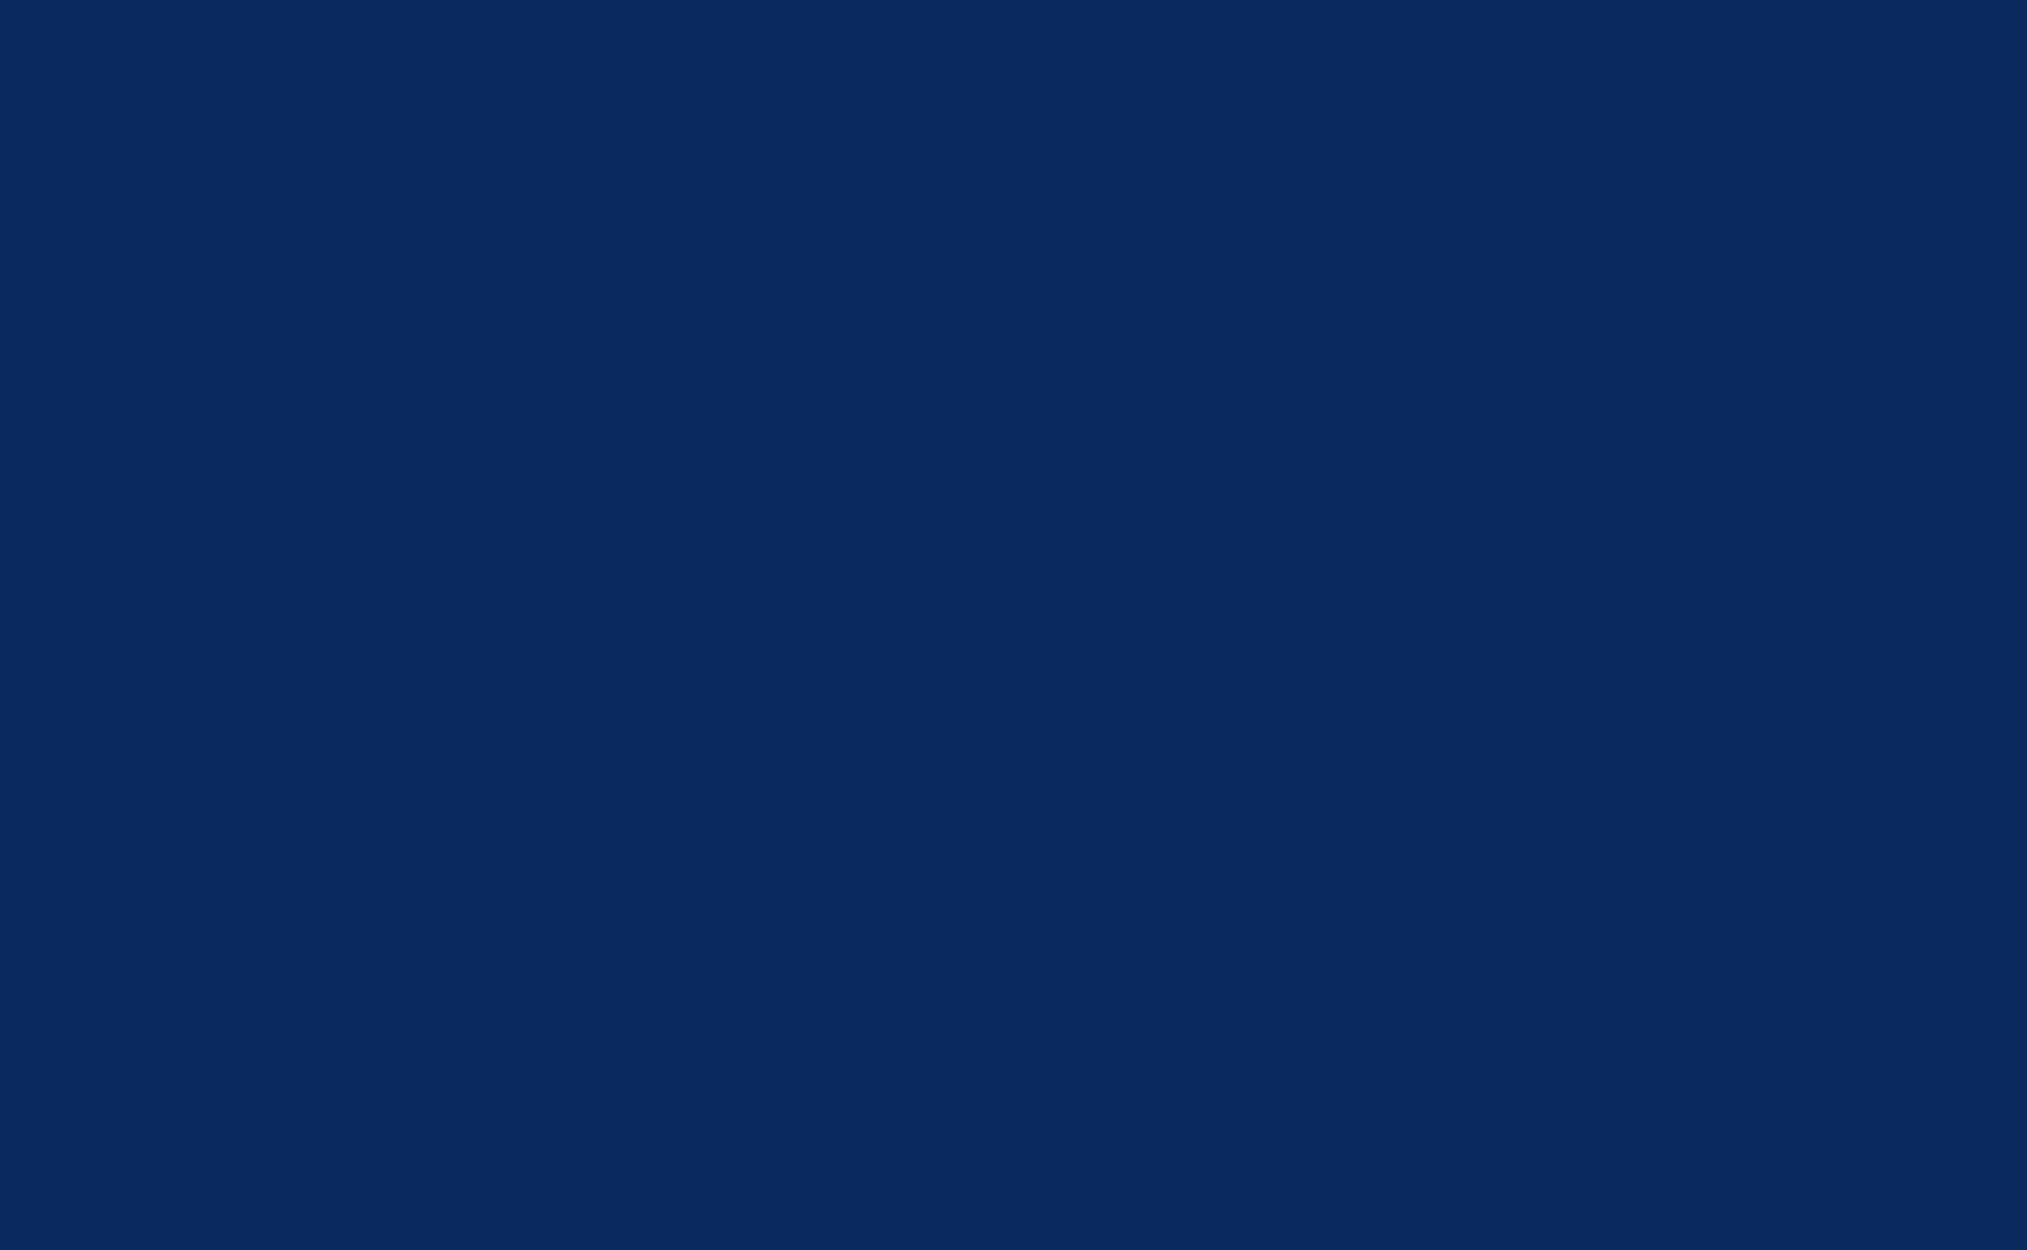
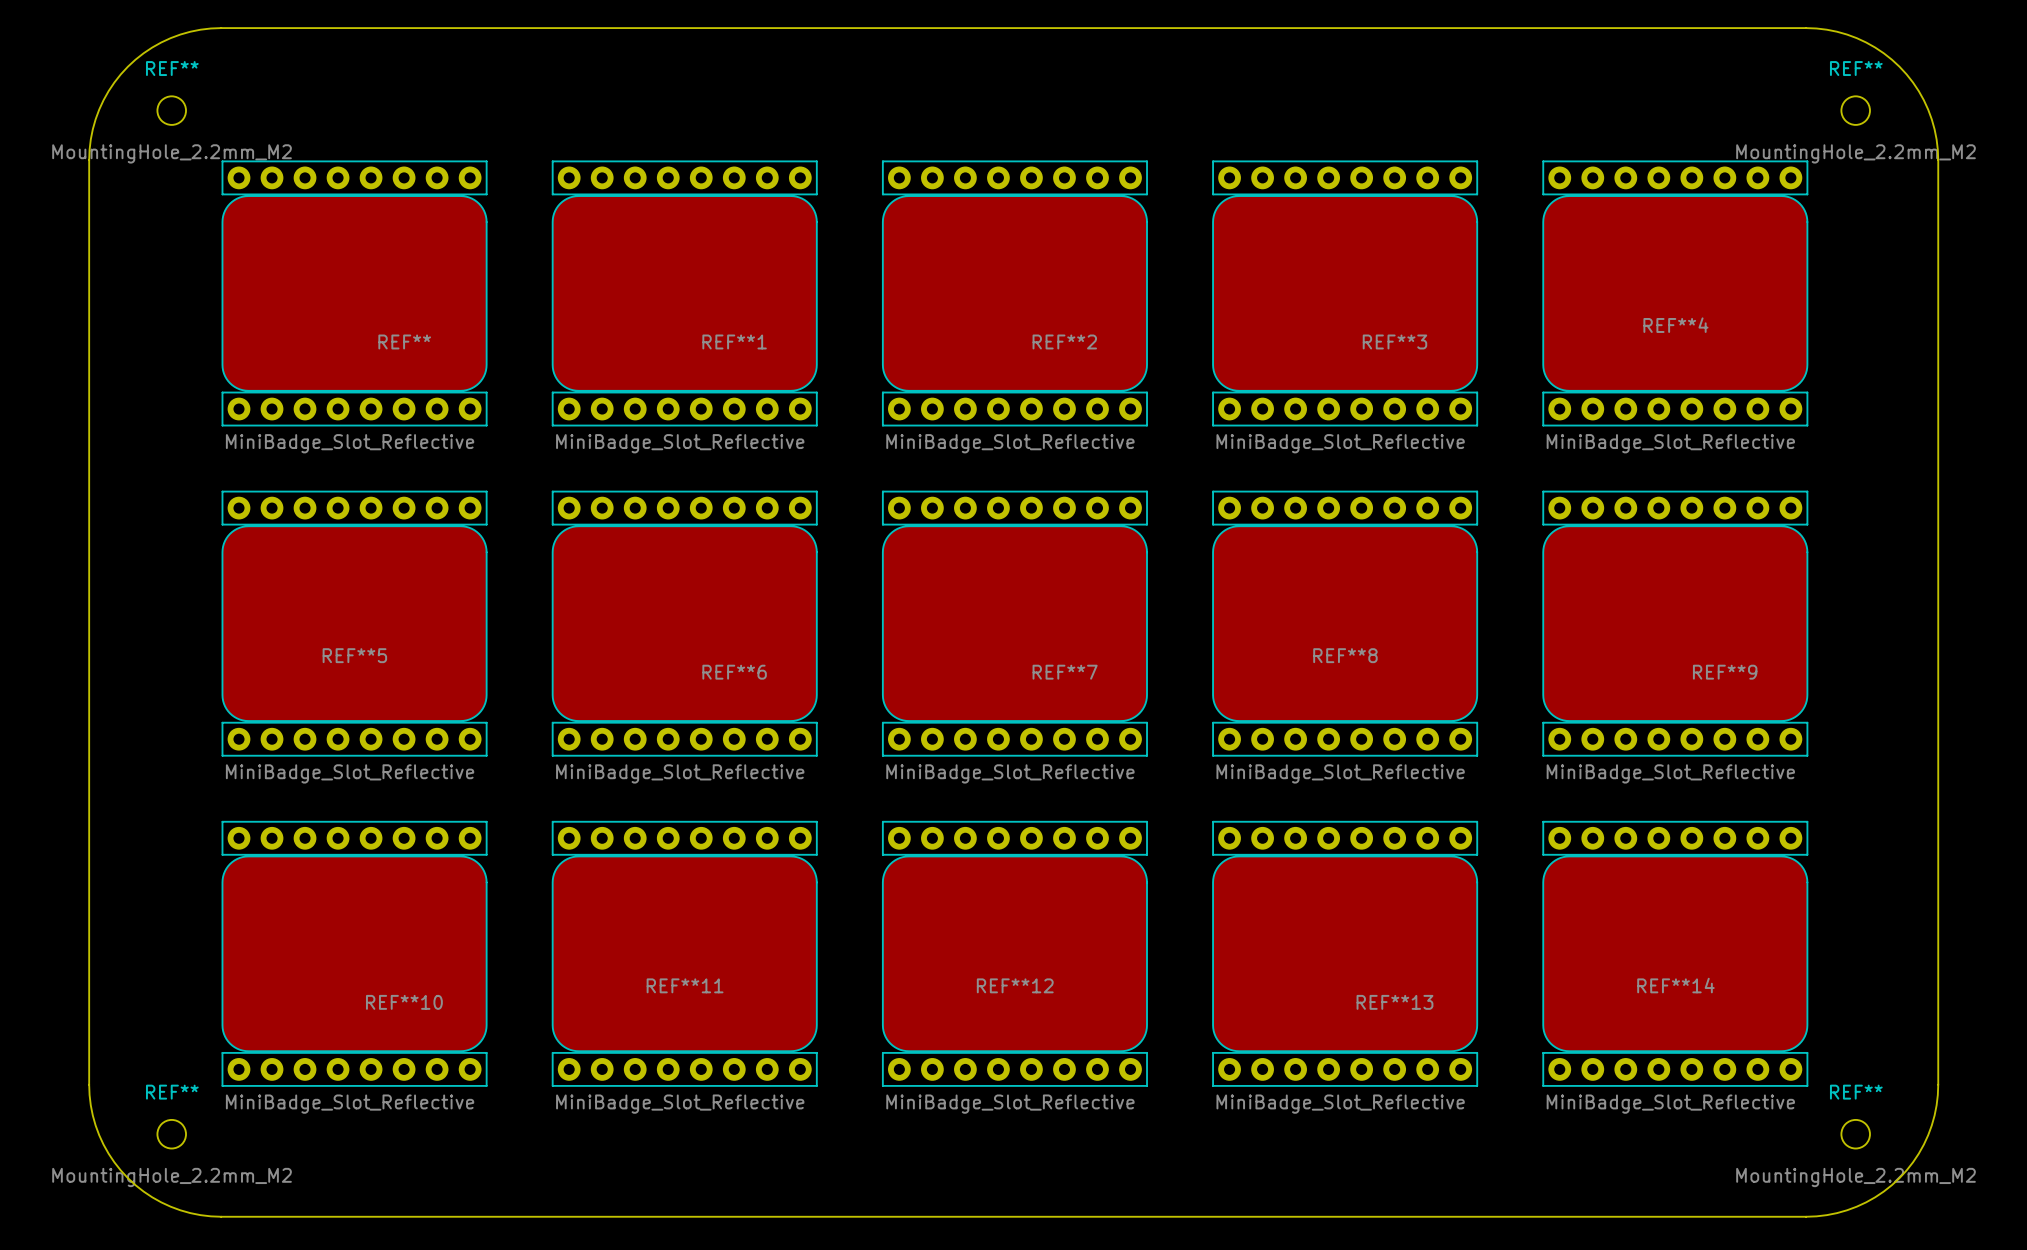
board edge: none -> (221, 28) (1806, 28) (1837, 31) (1856, 38) (1875, 47) (1899, 66) (1918, 91) (1931, 119) (1937, 149) (1938, 1084) (1934, 1115) (1928, 1135) (1918, 1153) (1899, 1178) (1875, 1197) (1856, 1206) (1837, 1213) (1806, 1216) (221, 1216) (190, 1213) (170, 1206) (152, 1197) (127, 1178) (108, 1153) (95, 1125) (89, 1095) (89, 149) (92, 129) (99, 109) (114, 82) (127, 66) (143, 53) (170, 38) (190, 31) (221, 28)
REF**: none -> MountingHole_2.2mm_M2 (171, 110)
REF**: none -> MountingHole_2.2mm_M2 (1855, 110)
REF**: none -> MiniBadge_Slot_Reflective (354, 293)
REF**1: none -> MiniBadge_Slot_Reflective (684, 293)
REF**2: none -> MiniBadge_Slot_Reflective (1014, 293)
REF**3: none -> MiniBadge_Slot_Reflective (1345, 293)
REF**4: none -> MiniBadge_Slot_Reflective (1675, 293)
REF**5: none -> MiniBadge_Slot_Reflective (354, 623)
REF**6: none -> MiniBadge_Slot_Reflective (684, 623)
REF**7: none -> MiniBadge_Slot_Reflective (1014, 623)
REF**8: none -> MiniBadge_Slot_Reflective (1345, 623)
REF**9: none -> MiniBadge_Slot_Reflective (1675, 623)
REF**10: none -> MiniBadge_Slot_Reflective (354, 953)
REF**11: none -> MiniBadge_Slot_Reflective (684, 953)
REF**12: none -> MiniBadge_Slot_Reflective (1014, 953)
REF**13: none -> MiniBadge_Slot_Reflective (1345, 953)
REF**14: none -> MiniBadge_Slot_Reflective (1675, 953)
REF**: none -> MountingHole_2.2mm_M2 (171, 1134)
REF**: none -> MountingHole_2.2mm_M2 (1855, 1134)

